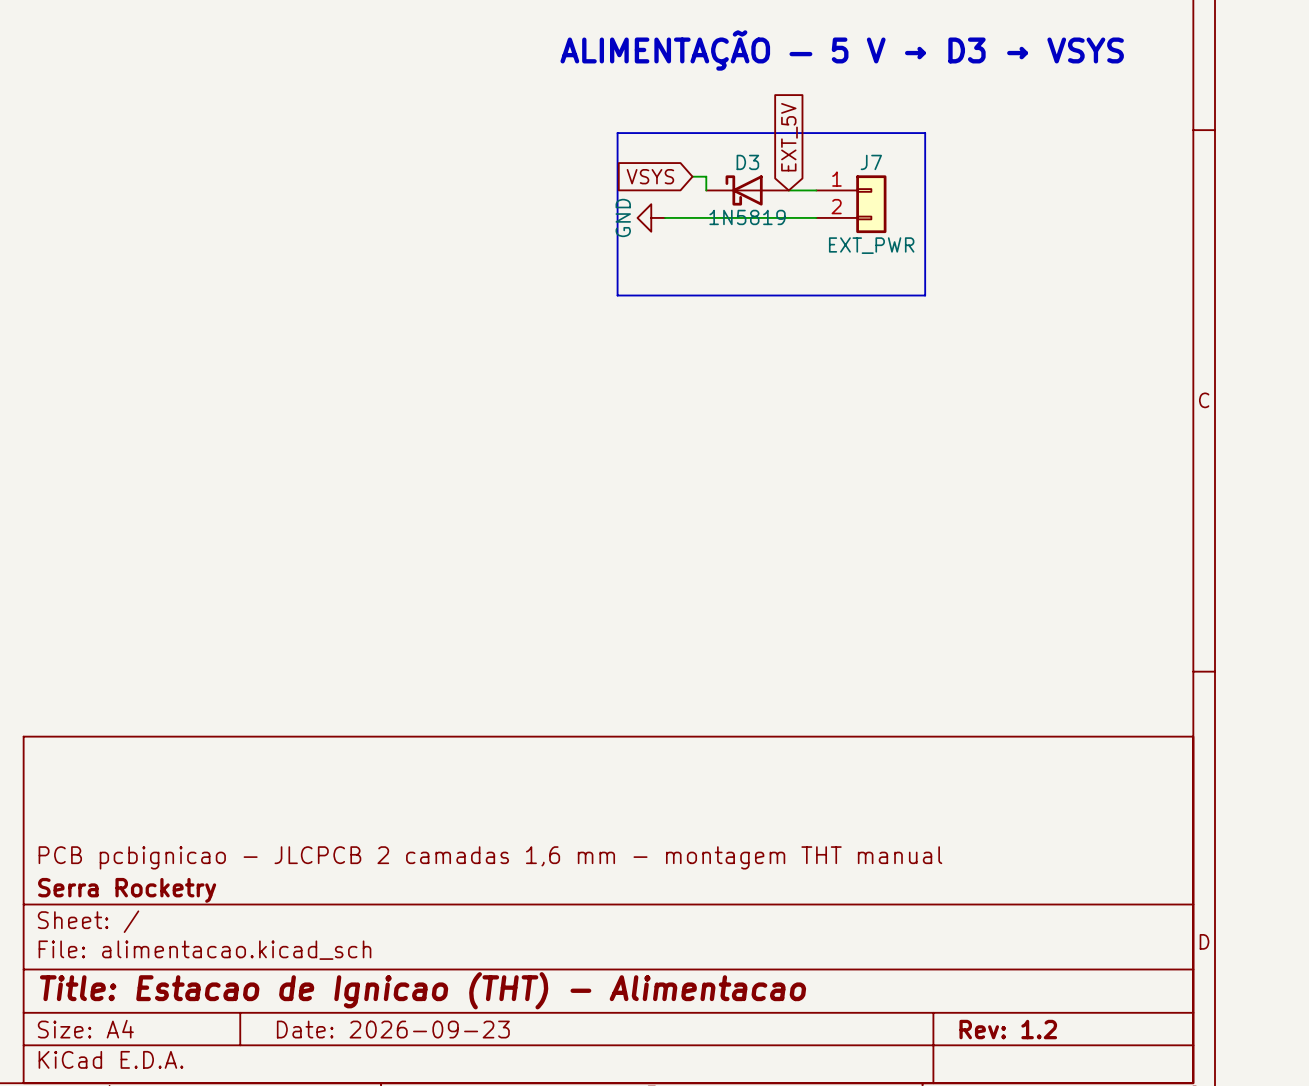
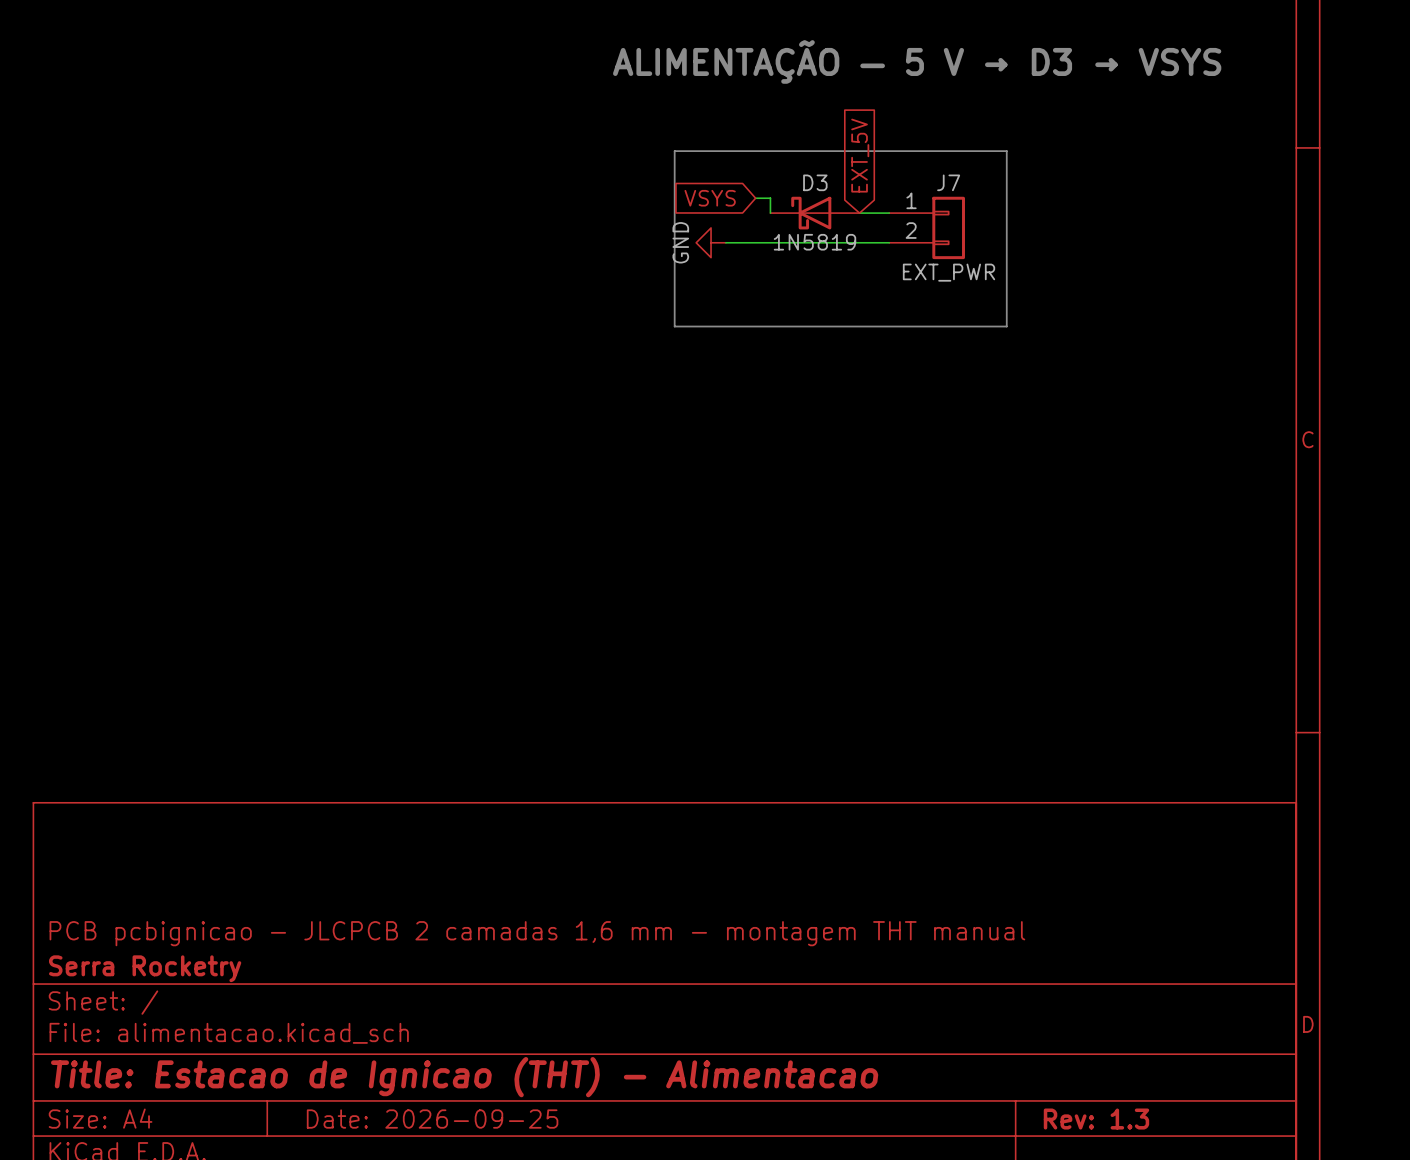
title block: Date: 2026-09-23 (393, 1029) -> Date: 2026-09-25 (432, 1119)
title block: Rev: 1.2 (1008, 1029) -> Rev: 1.3 (1096, 1119)

